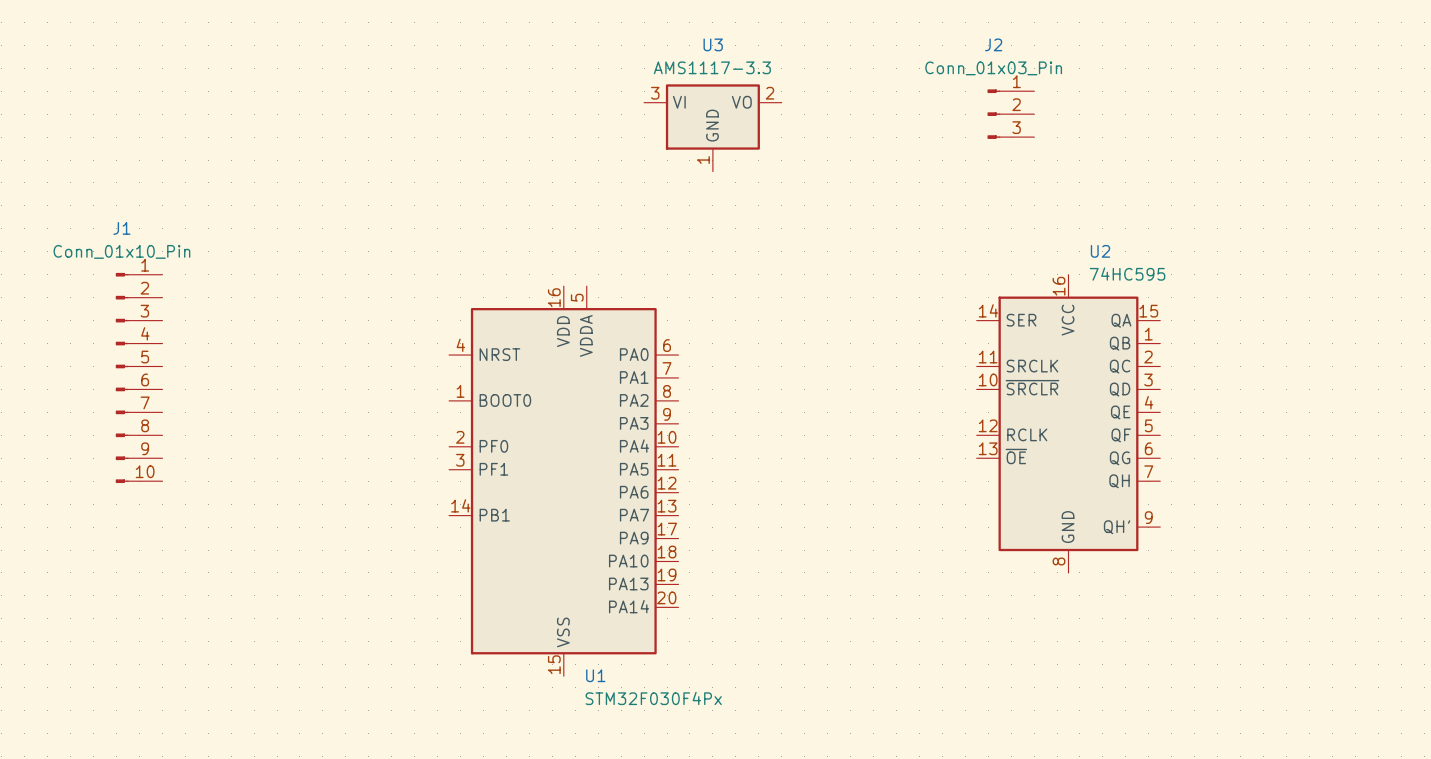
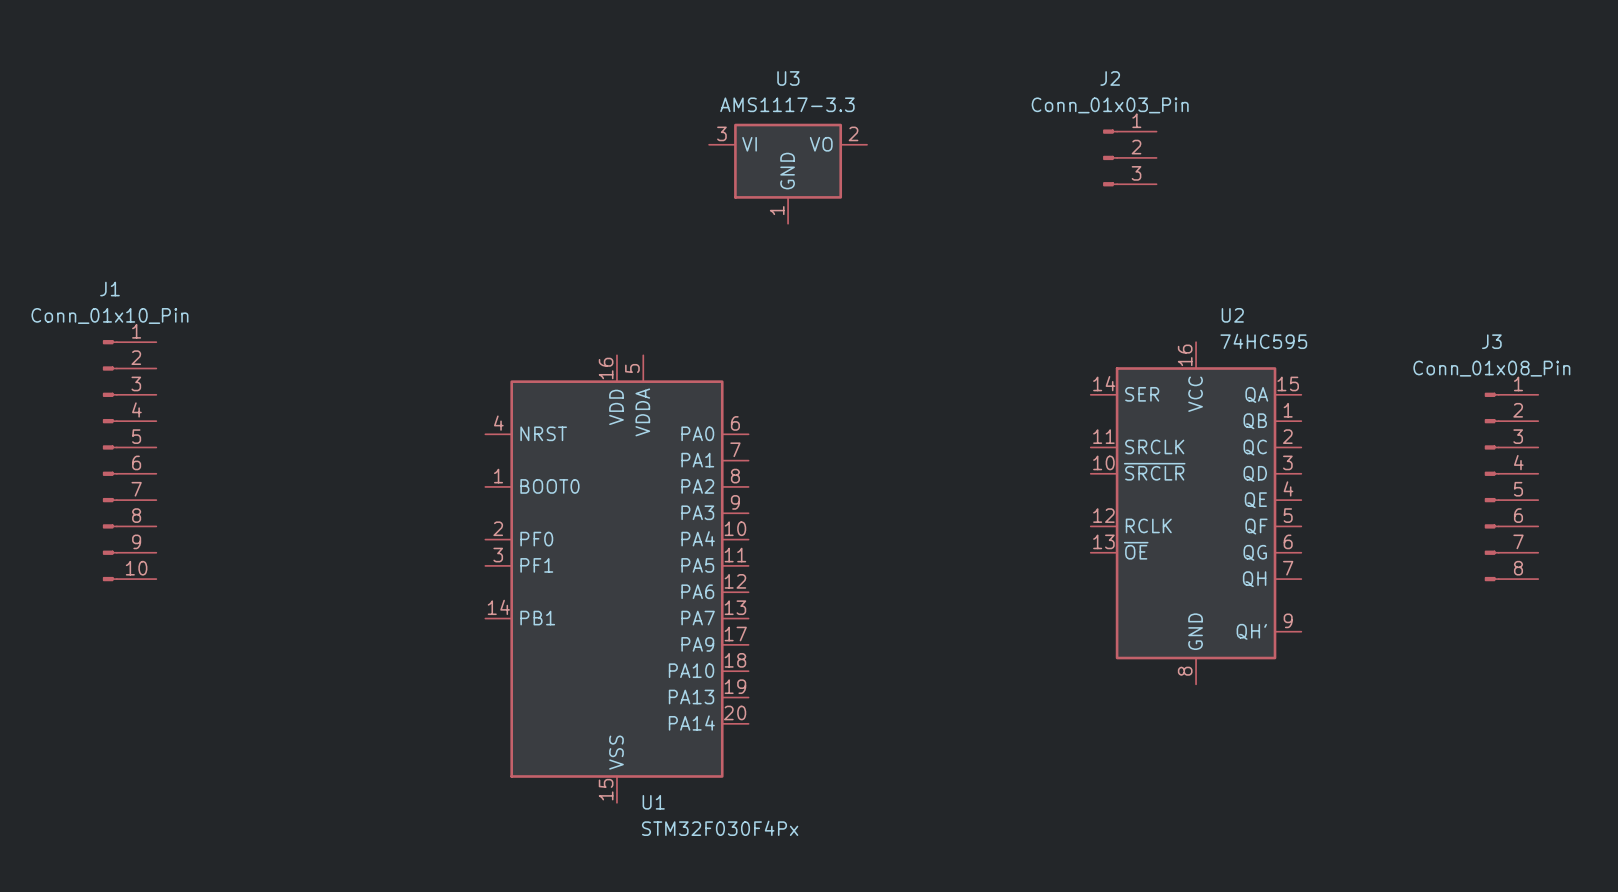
J3: none -> Conn_01x08_Pin (1511, 486)

